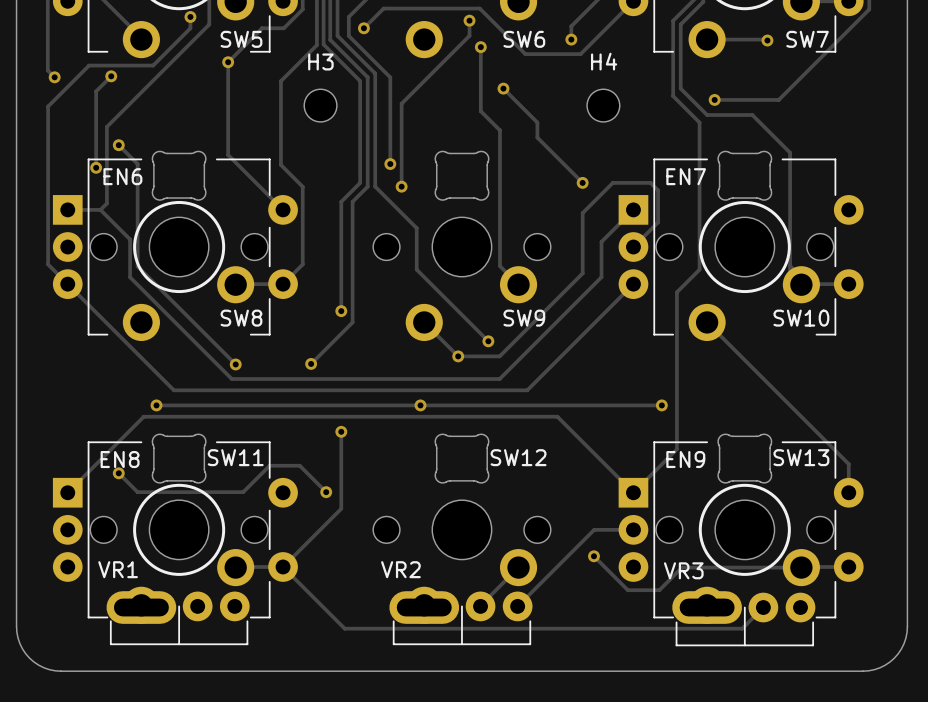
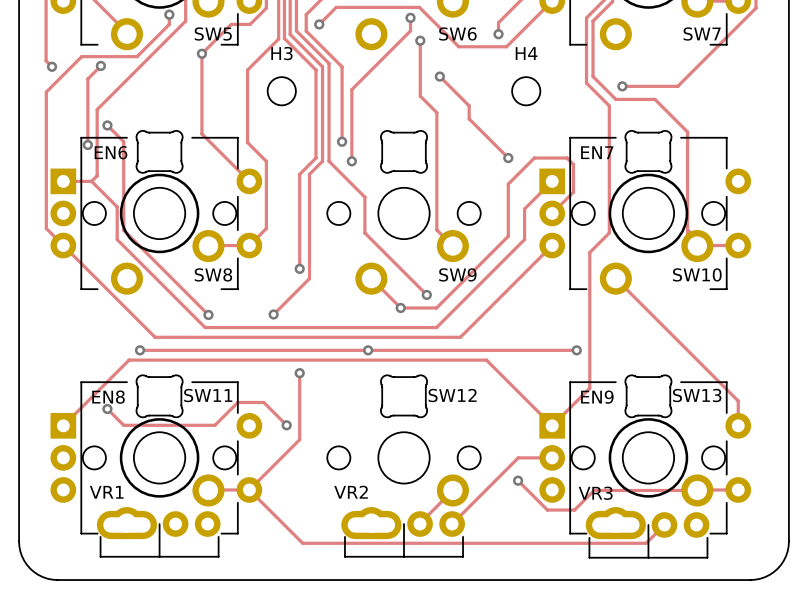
track: (707, 39) (767, 40) -> none
via: (767, 40) -> none

